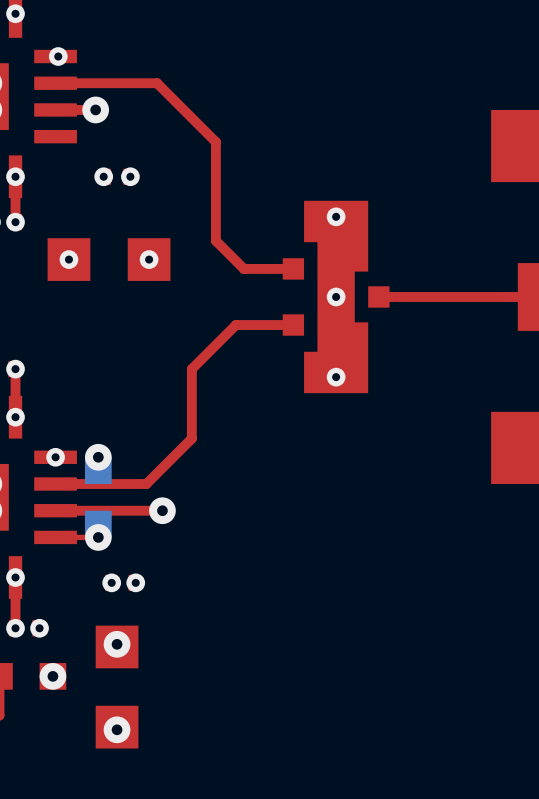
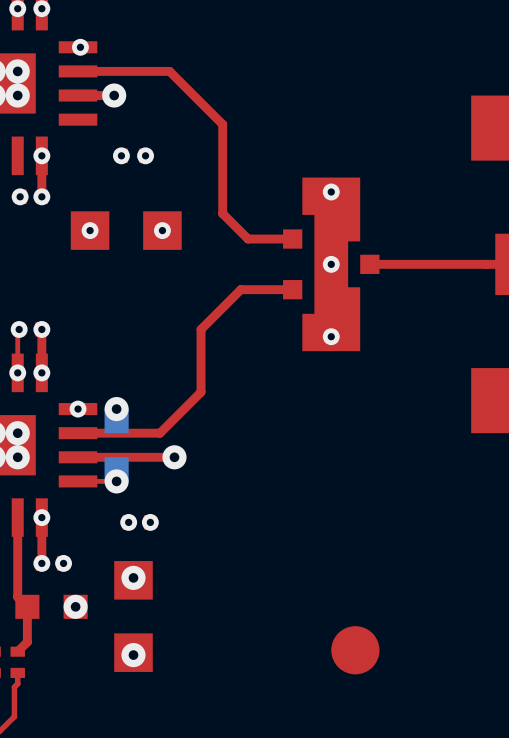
part: none -> (355, 650)

